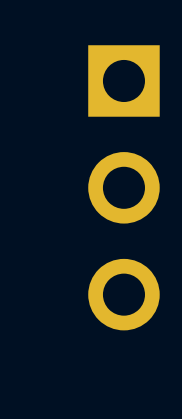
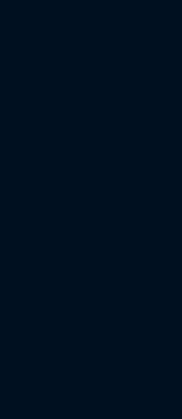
part: (123, 187) -> none

